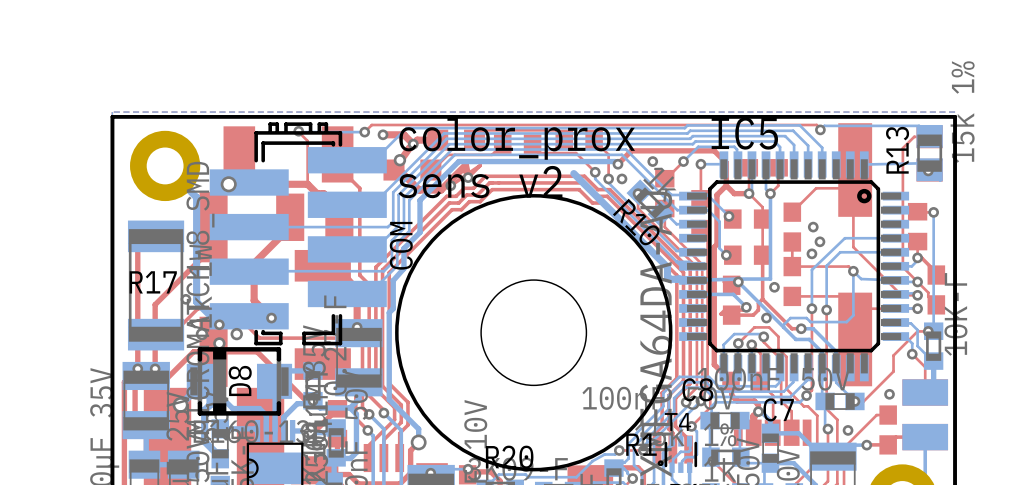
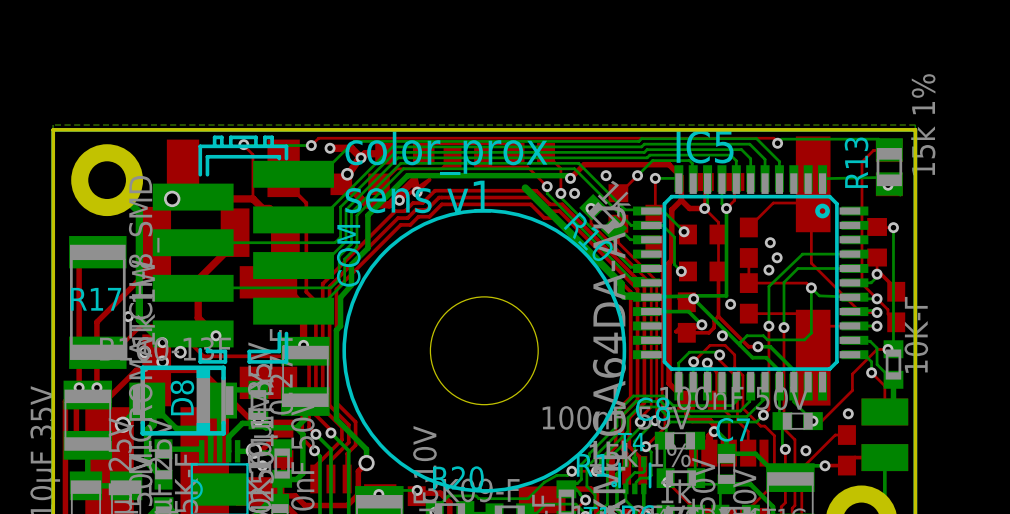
text: sens v2 (480, 182) -> sens v1 (418, 196)
D8 rotation: 0° (239, 381) -> 180° (183, 400)

